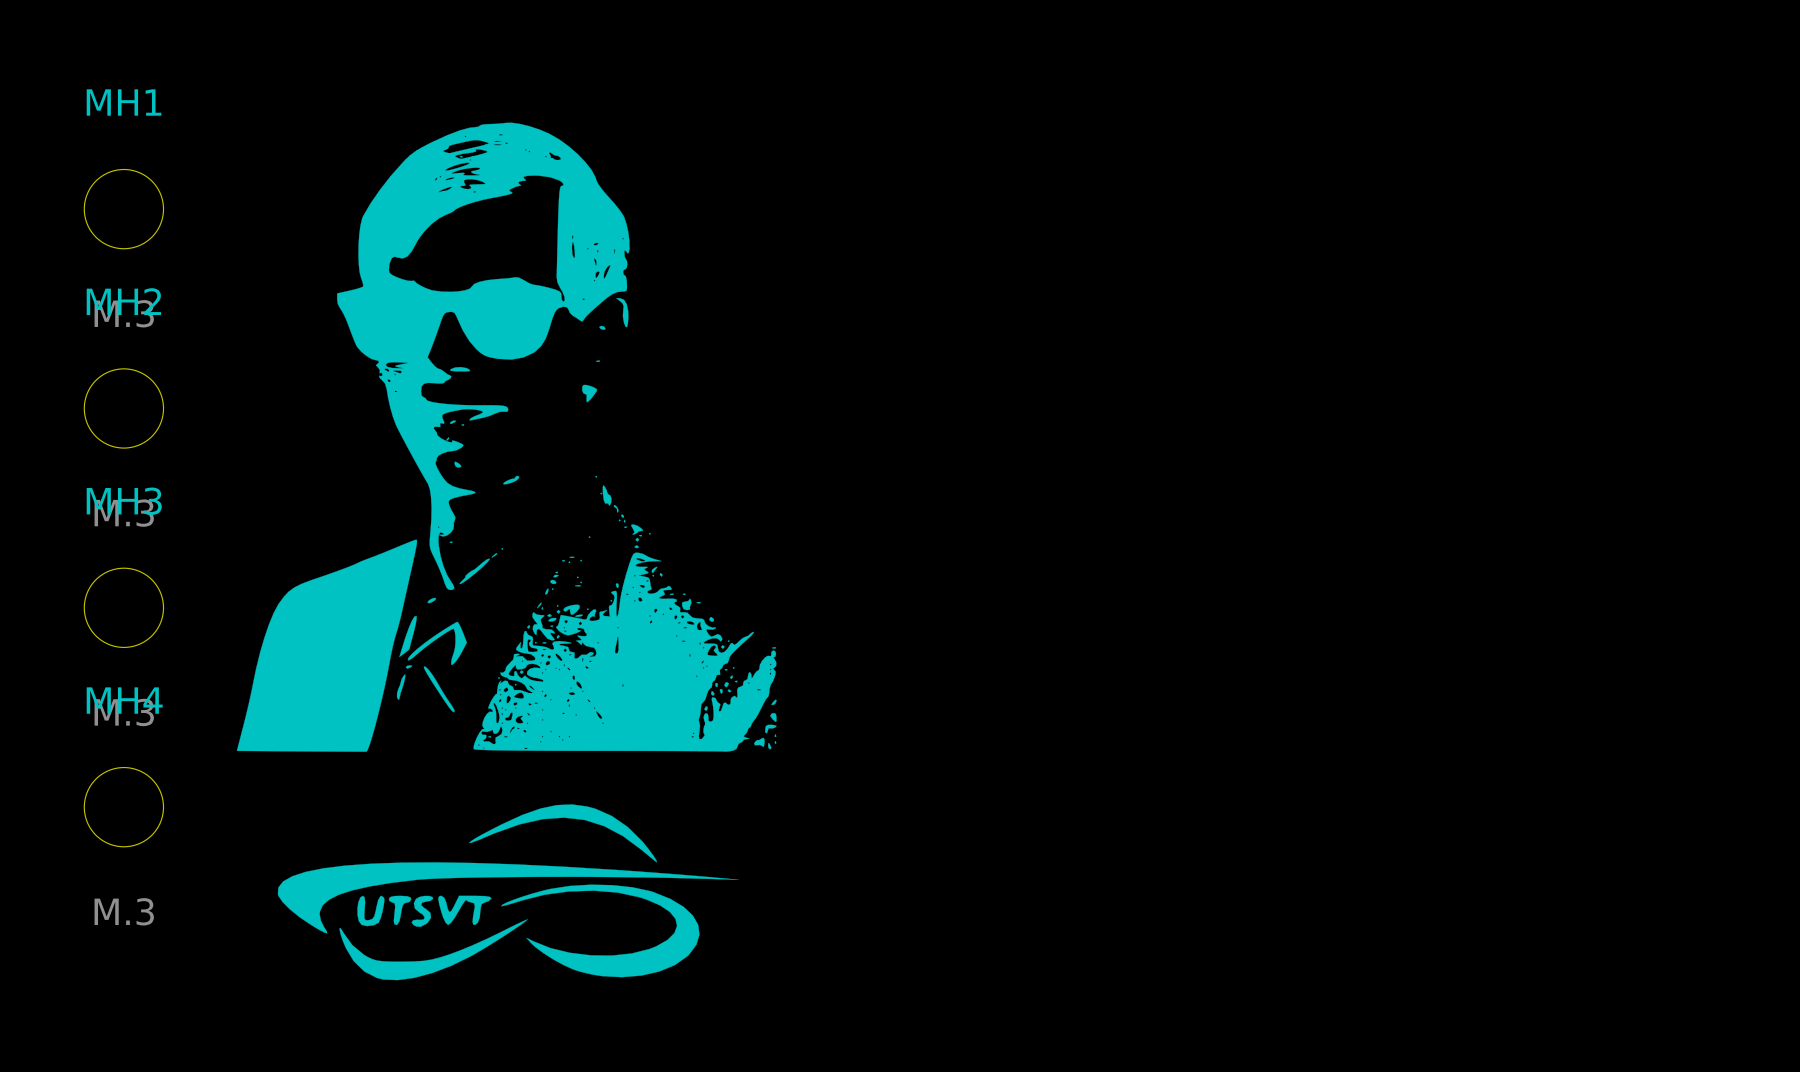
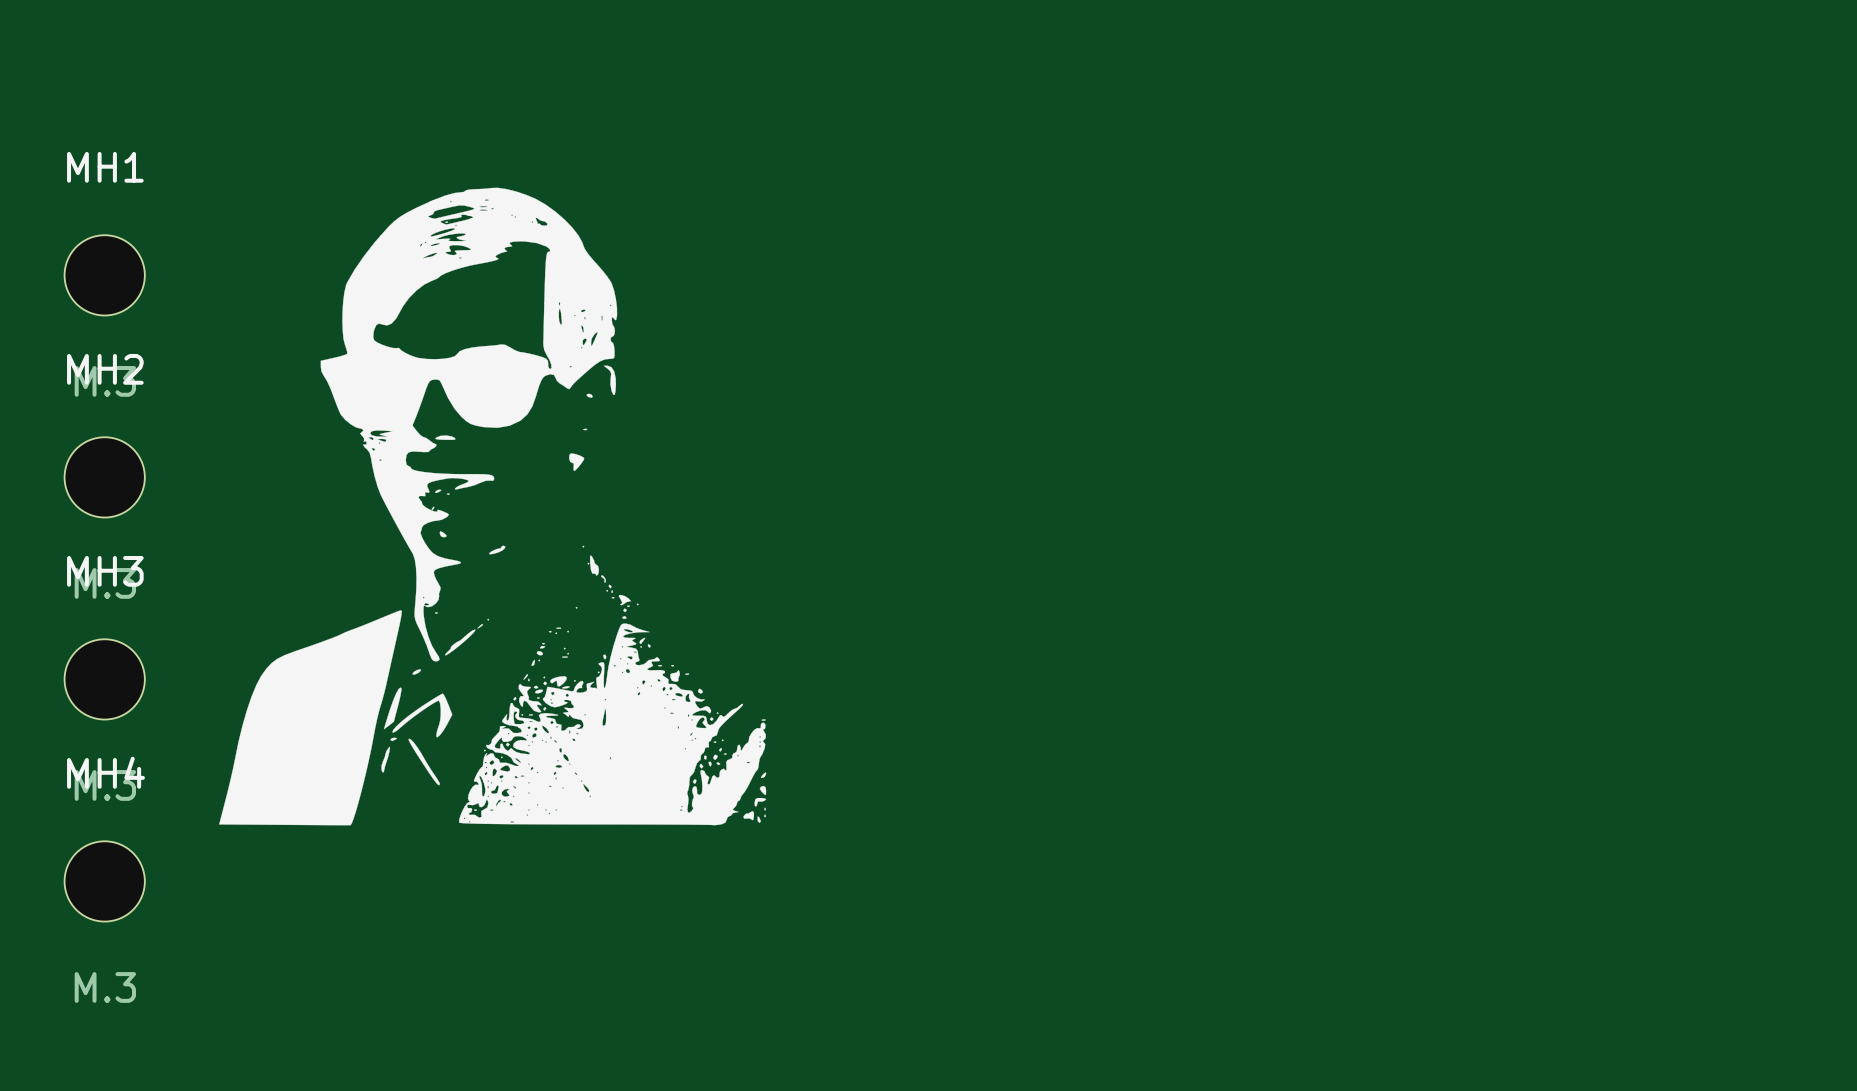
drawing: [277, 804, 739, 981] -> none

